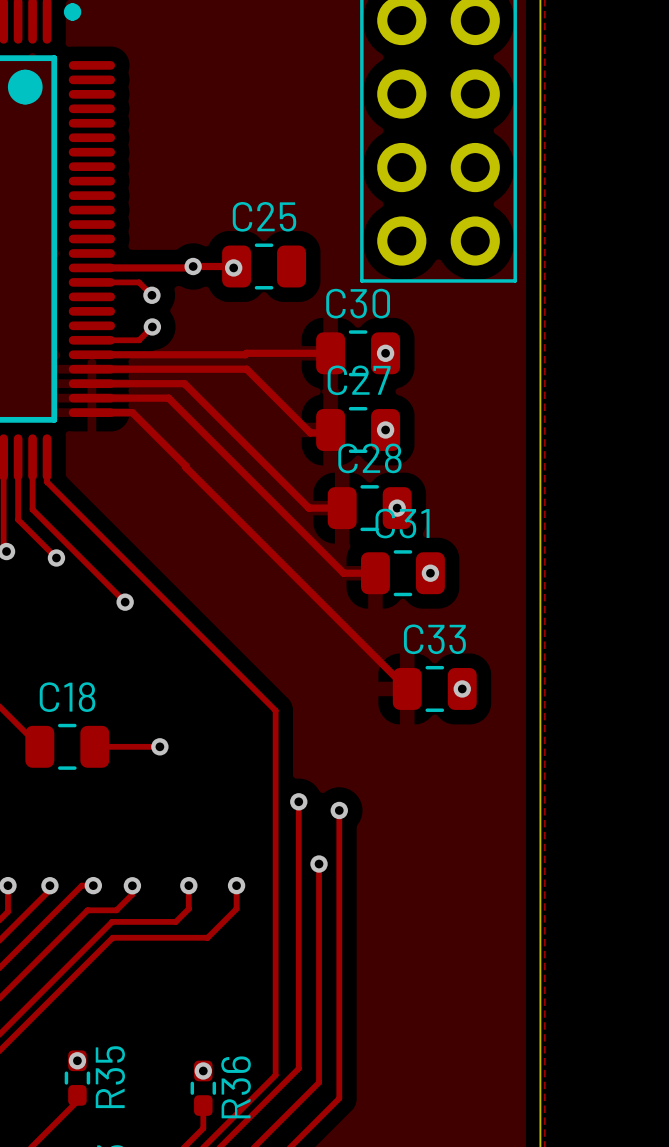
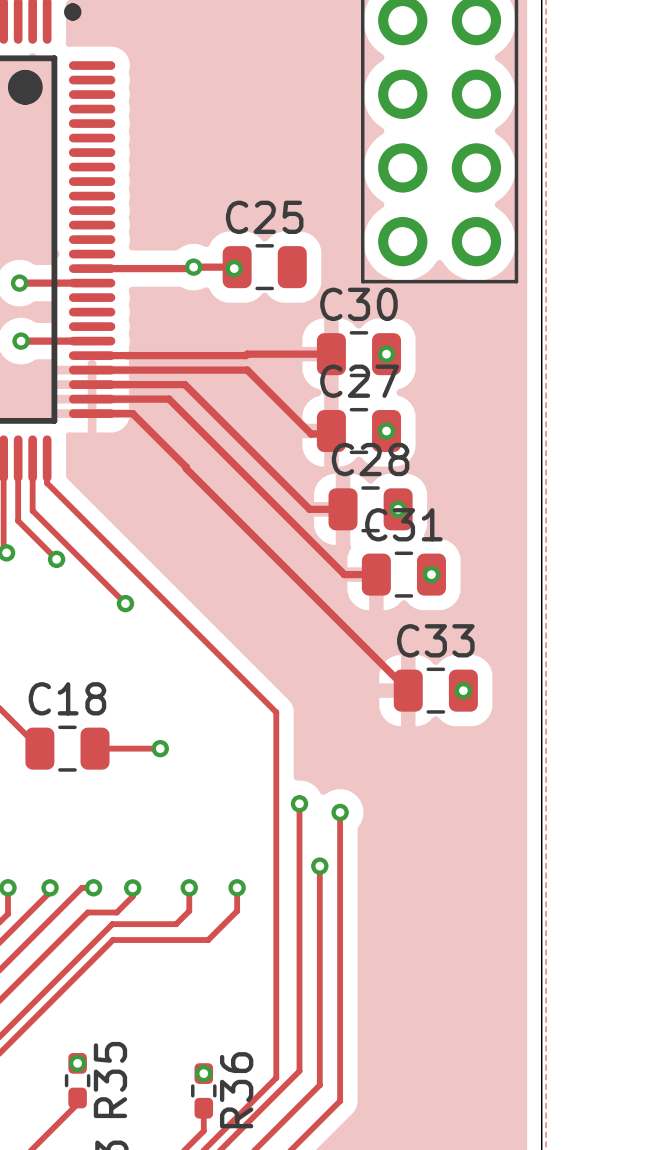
via: none -> (19, 283)
track: (91, 282) (139, 282) (152, 296) -> (92, 283) (19, 283)
via: (151, 295) -> none
track: (152, 326) (139, 340) (91, 340) -> (21, 341) (92, 341)
via: (152, 326) -> none
via: none -> (21, 341)

